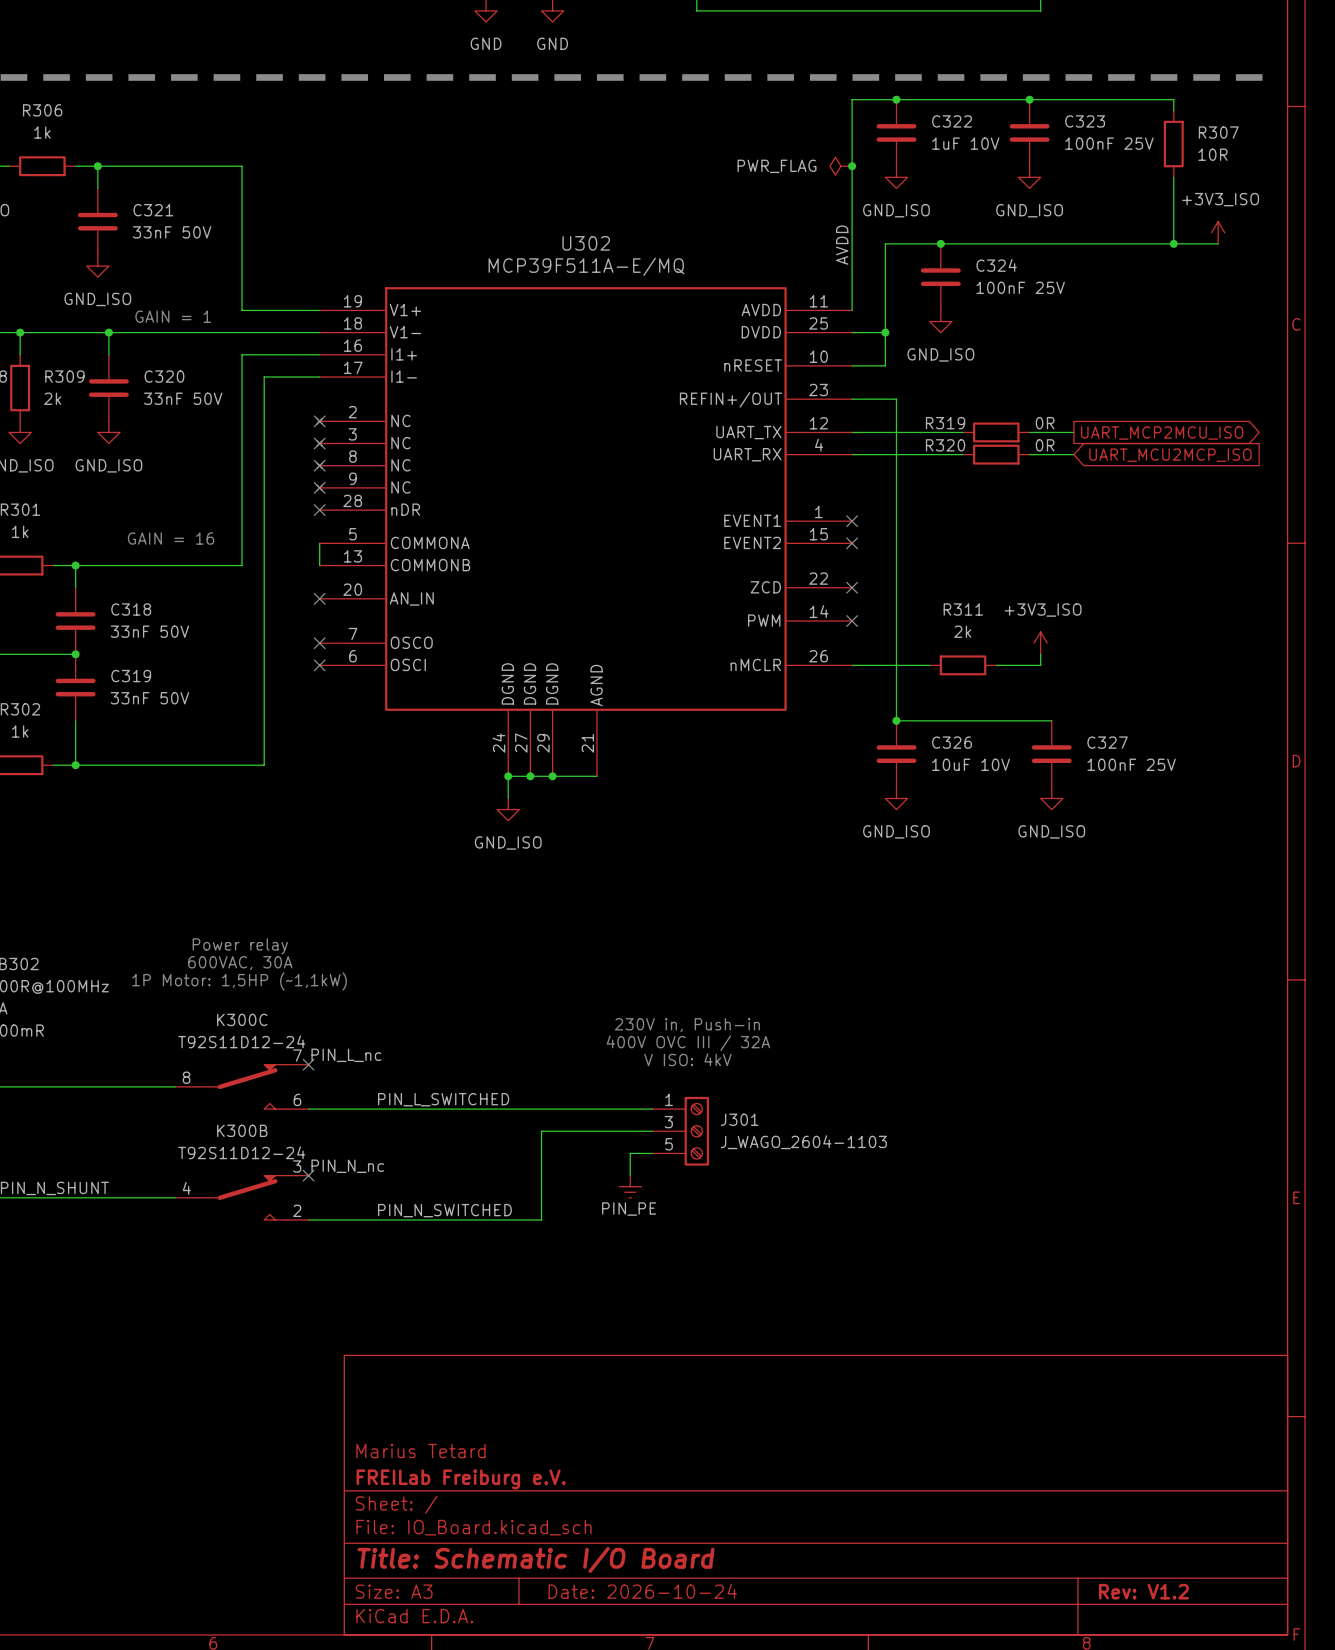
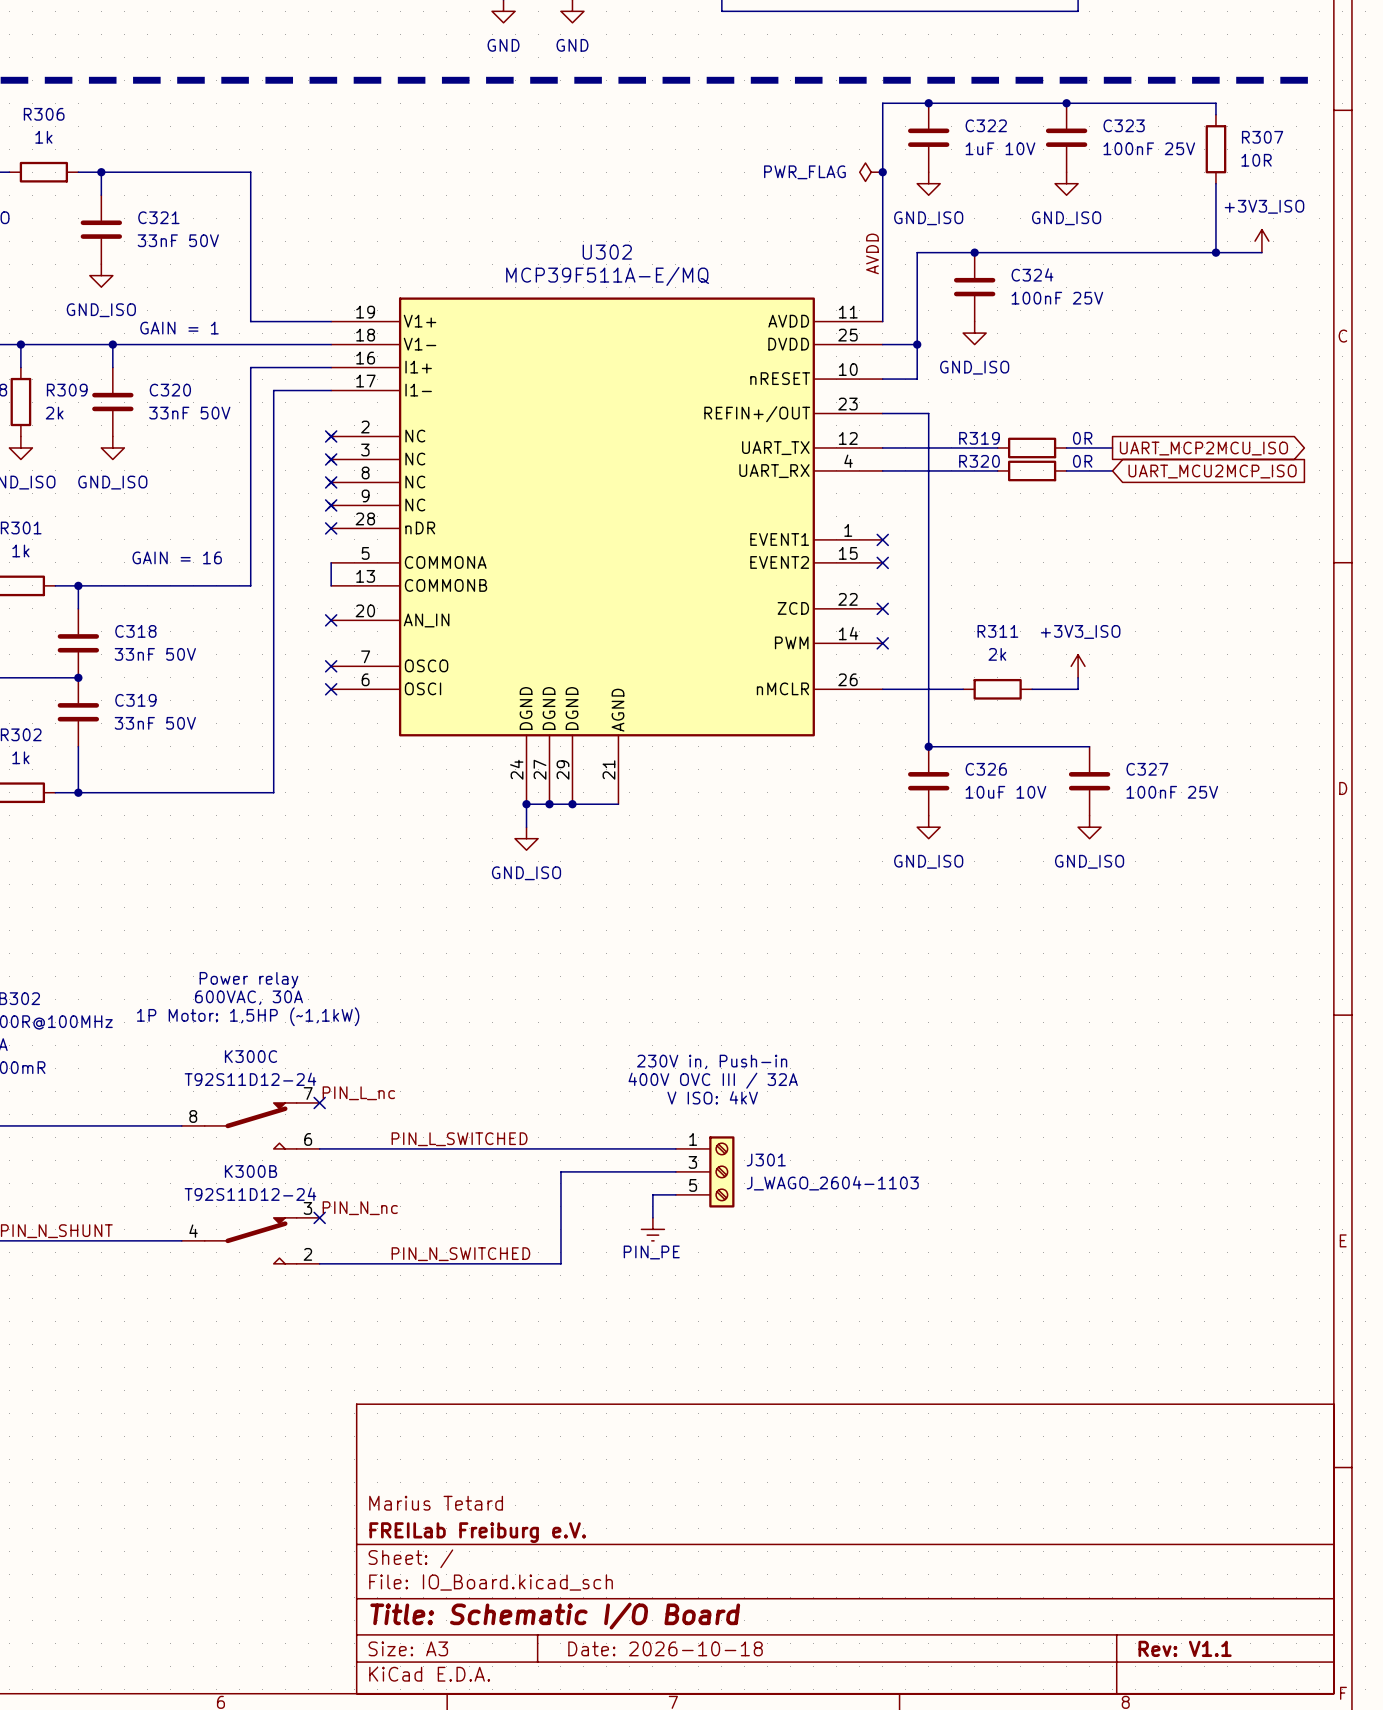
title block: Date: 2026-10-24 (642, 1591) -> Date: 2026-10-18 (665, 1648)
title block: Rev: V1.2 (1143, 1591) -> Rev: V1.1 (1185, 1648)

